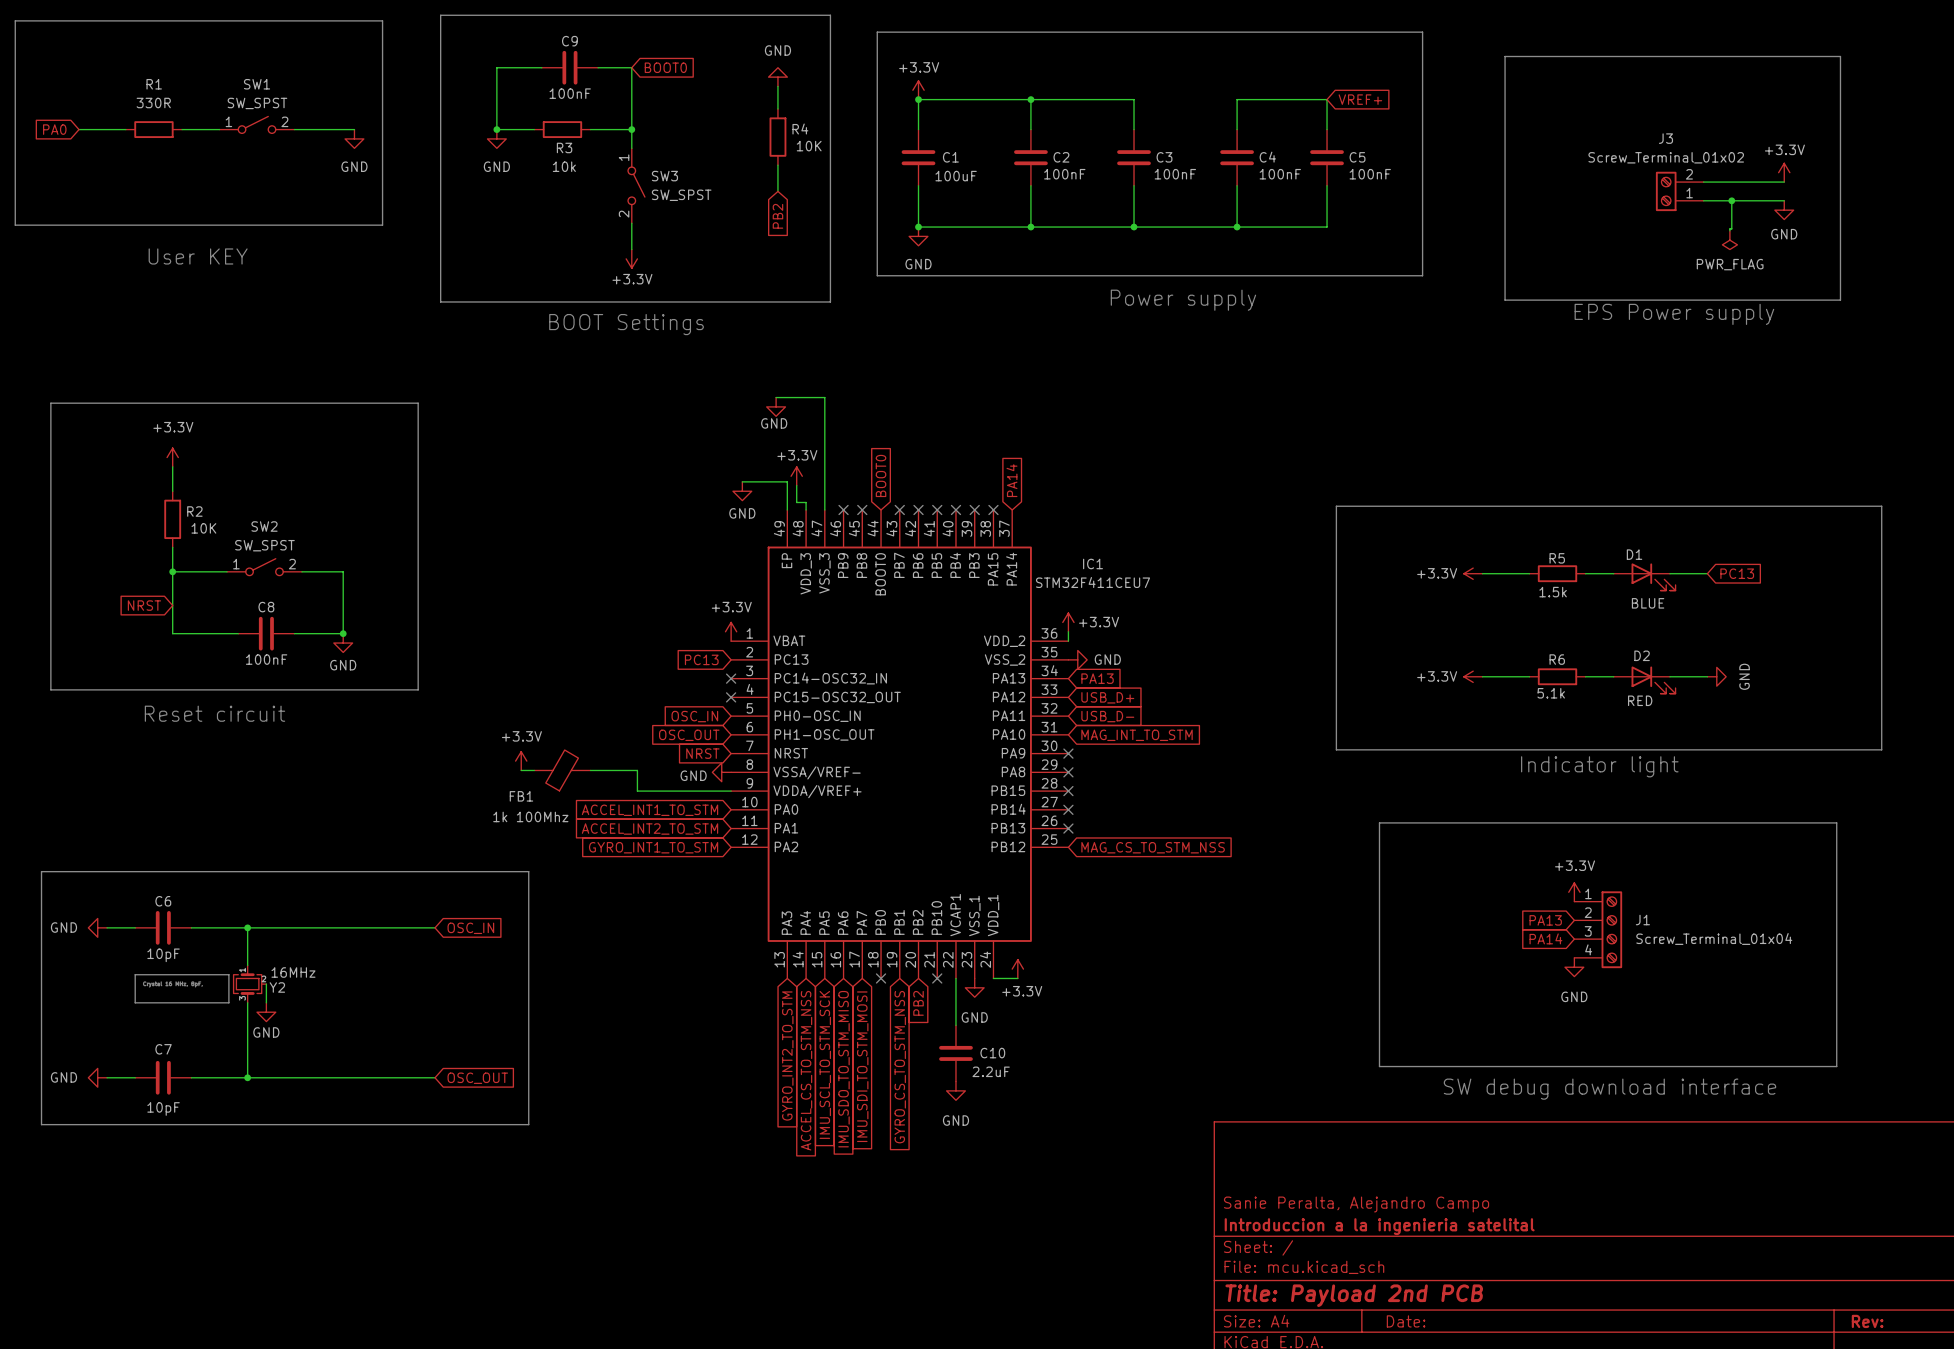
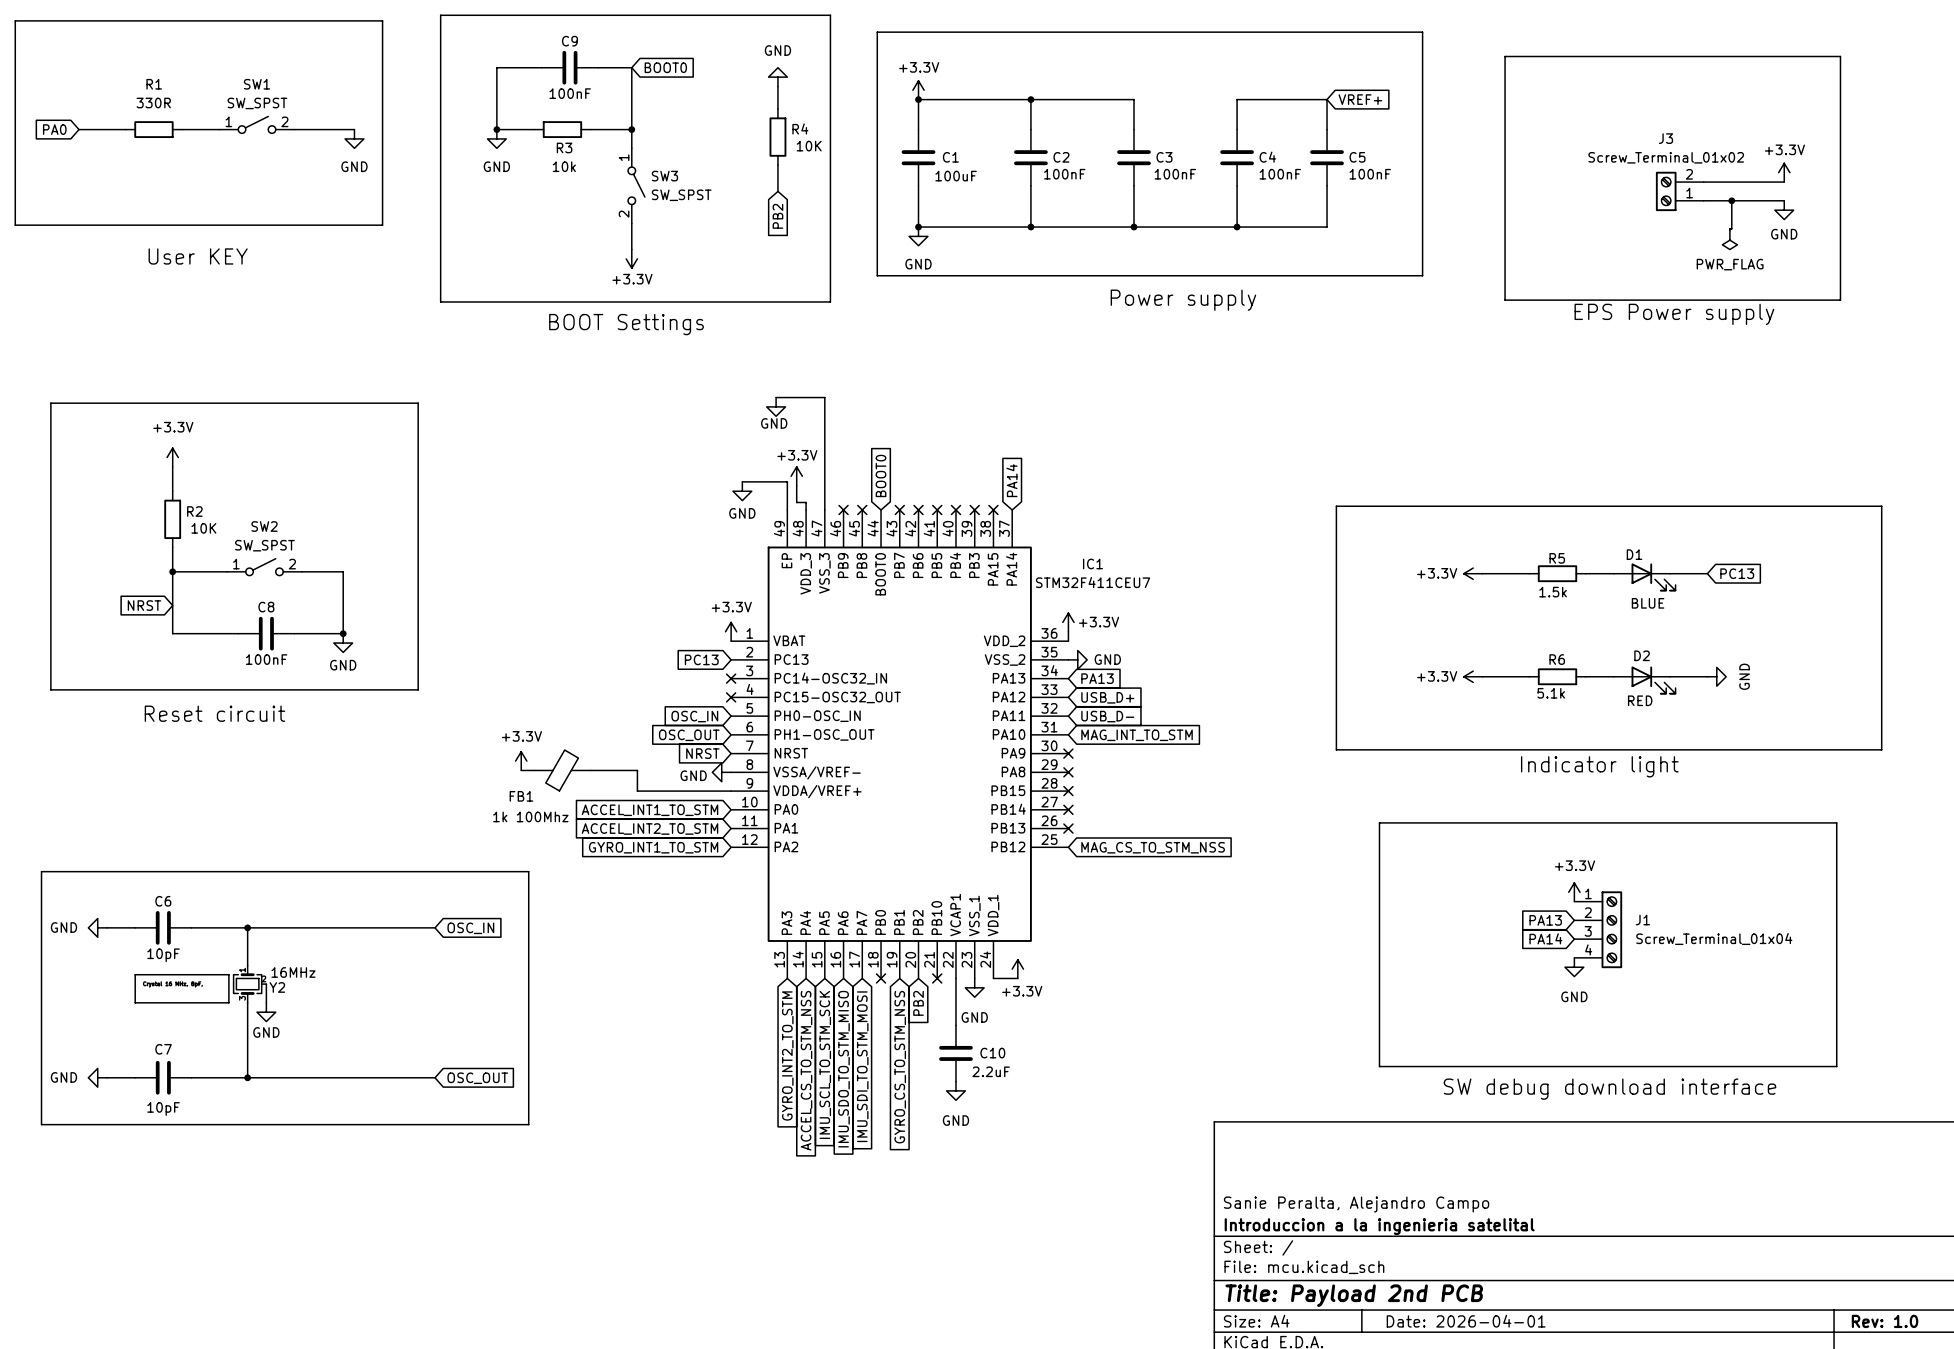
title block: Date: (1406, 1321) -> Date: 2026-04-01 (1466, 1321)
title block: Rev: (1867, 1321) -> Rev: 1.0 (1885, 1321)

